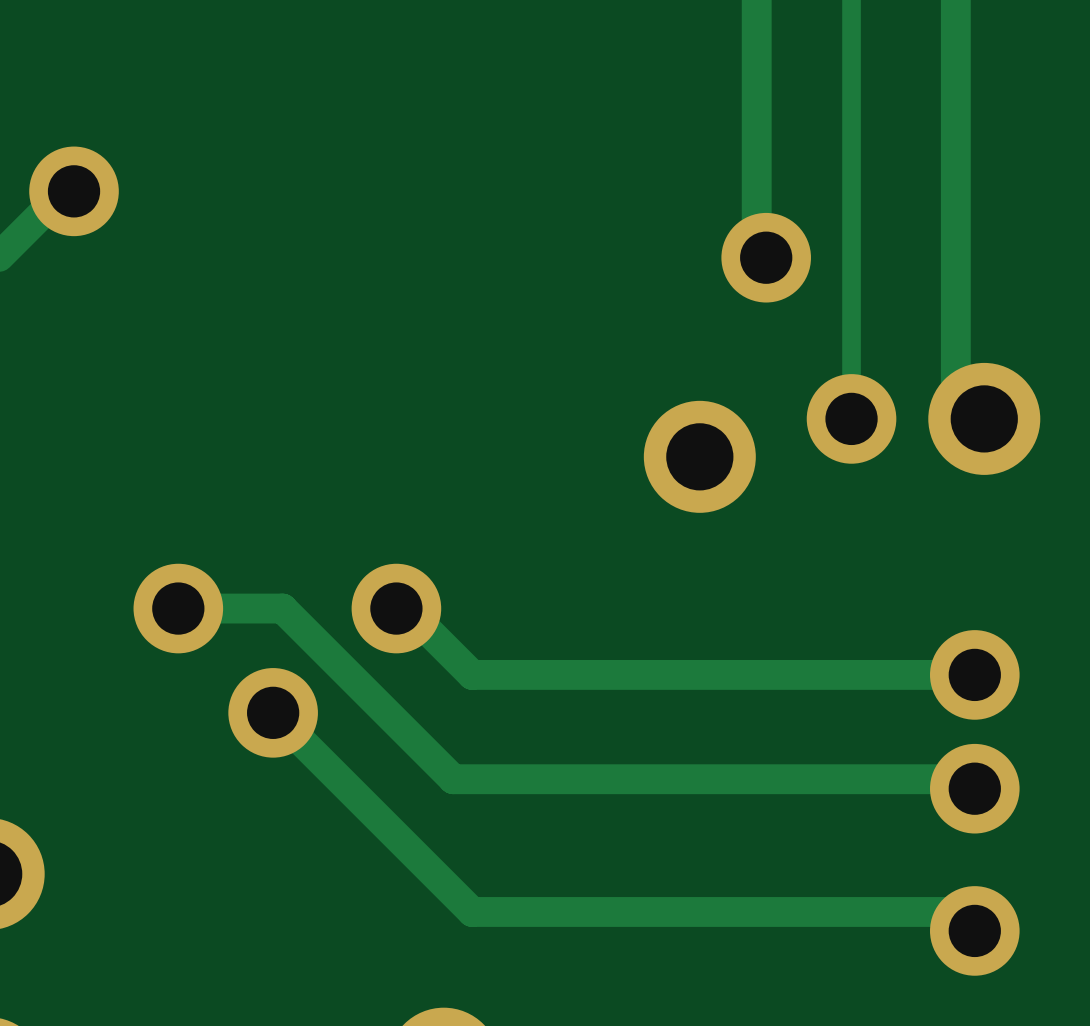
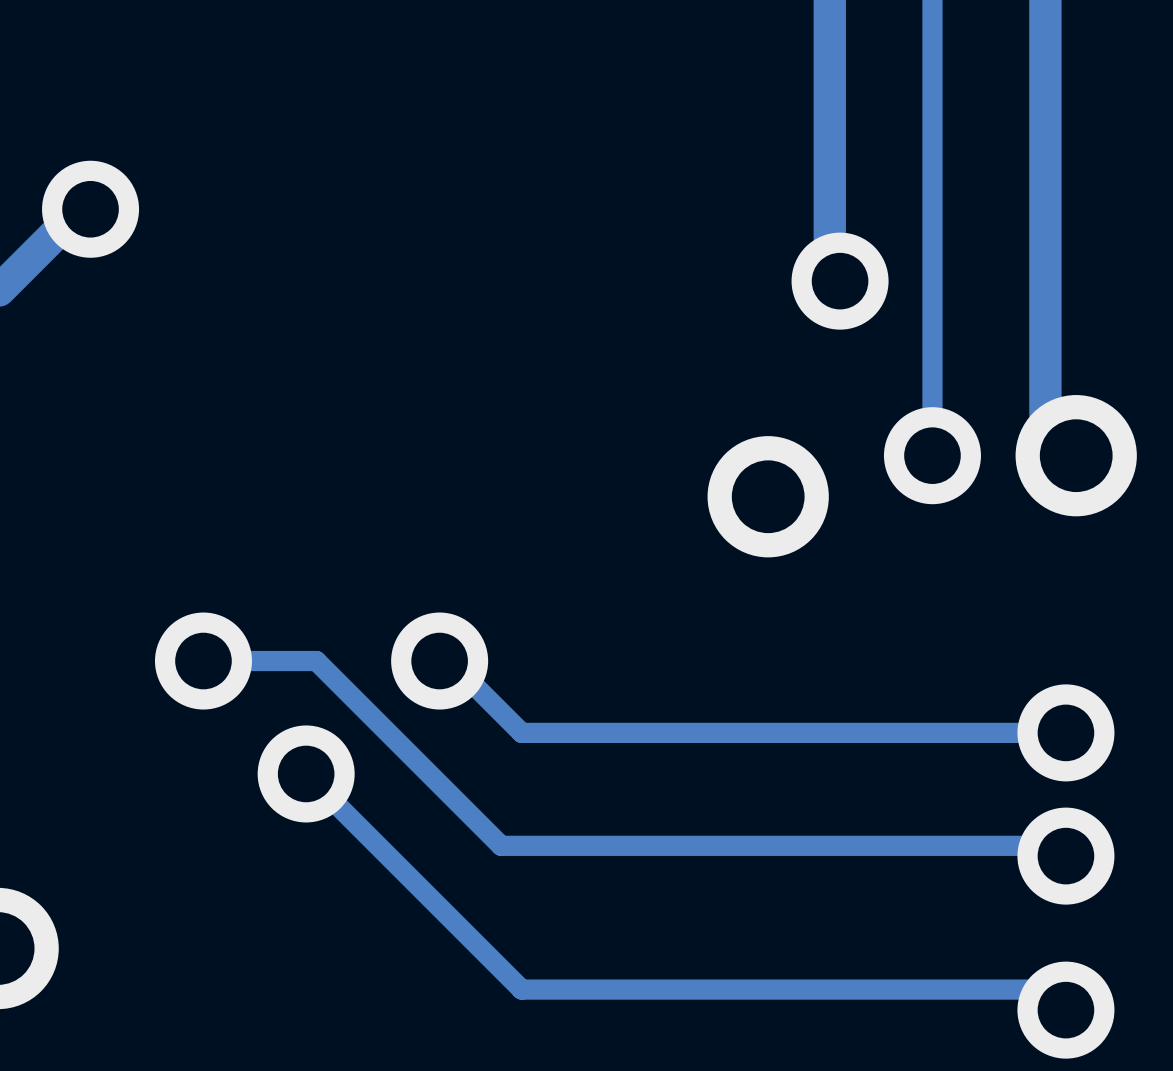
track width: thick (178, 608) (282, 608) (453, 779) (965, 779) (974, 788) -> thin (203, 661) (316, 661) (501, 845) (1055, 845) (1065, 856)
track width: thick (396, 608) (405, 608) (472, 674) (974, 674) -> thin (439, 661) (449, 661) (521, 732) (1065, 732)
track width: thick (273, 712) (472, 911) (955, 911) (974, 930) -> thin (306, 773) (521, 989) (1045, 989) (1065, 1010)

